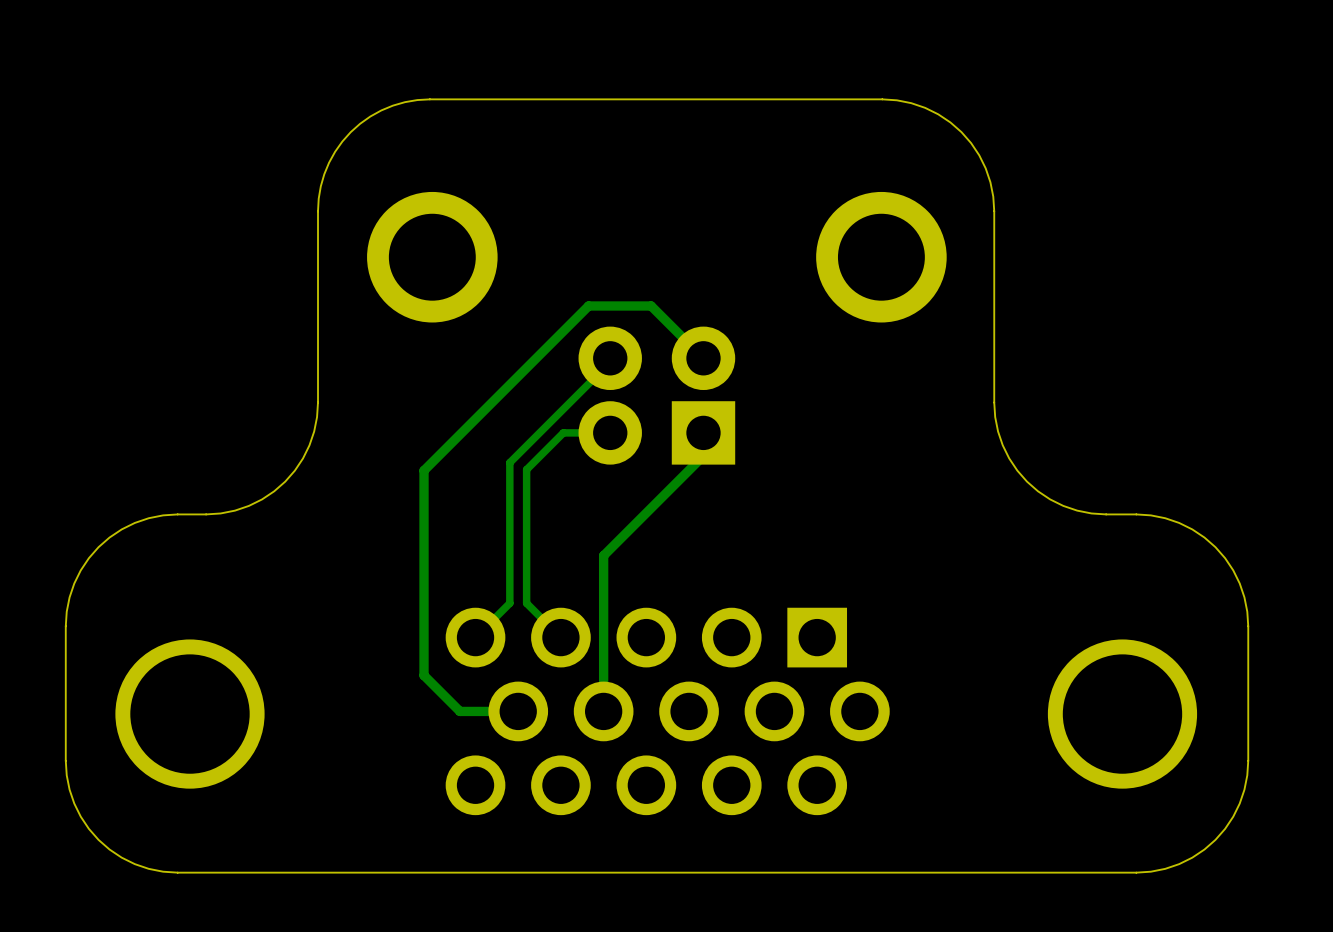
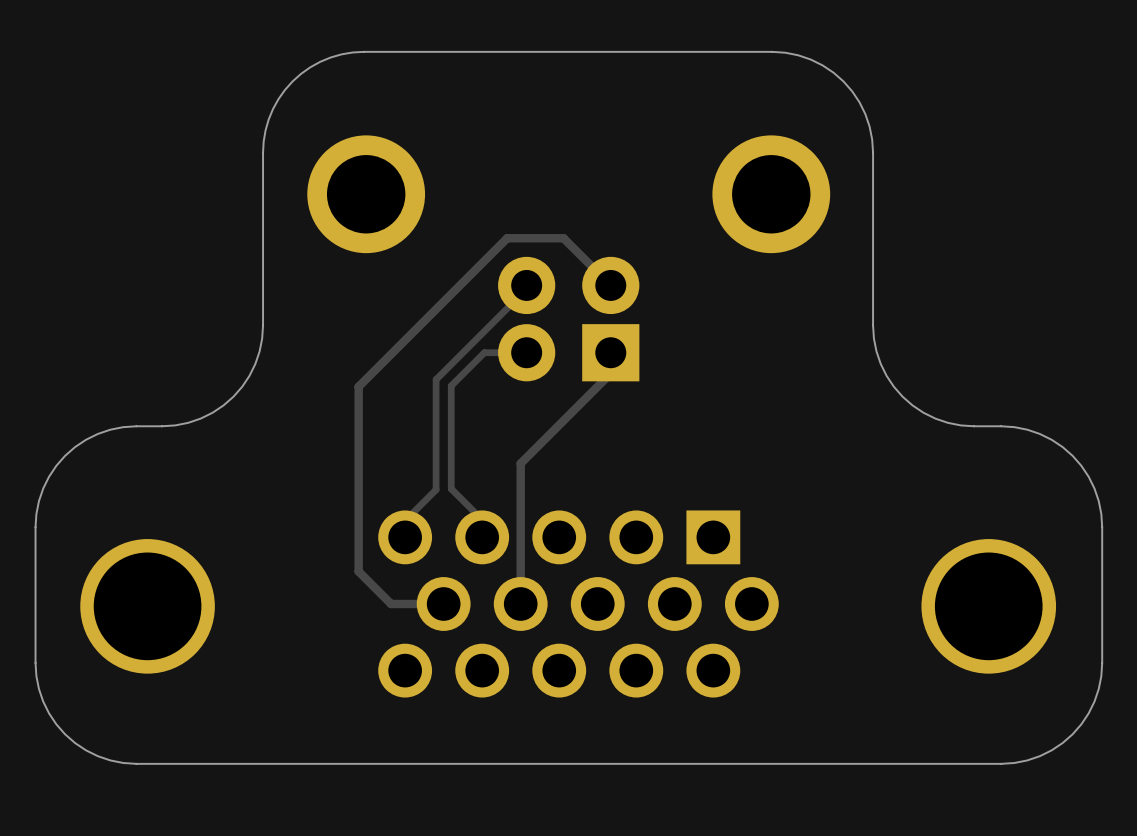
track: (526, 583) (526, 603) (560, 637) -> (451, 488) (482, 520)
track: (509, 584) (509, 603) (475, 637) -> (436, 489) (405, 520)
board edge: (1248, 760) (1247, 775) (1239, 803) (1225, 828) (1215, 839) (1192, 857) (1179, 864) (1165, 868) (1136, 872) (163, 871) (134, 864) (121, 857) (98, 839) (88, 828) (74, 803) (69, 789) (65, 760) -> (1102, 648) (1098, 689) (1088, 713) (1081, 724) (1072, 734) (1051, 750) (1027, 760) (1001, 763) (123, 762) (97, 756) (86, 750) (75, 742) (56, 724) (43, 701) (38, 689) (35, 648)

